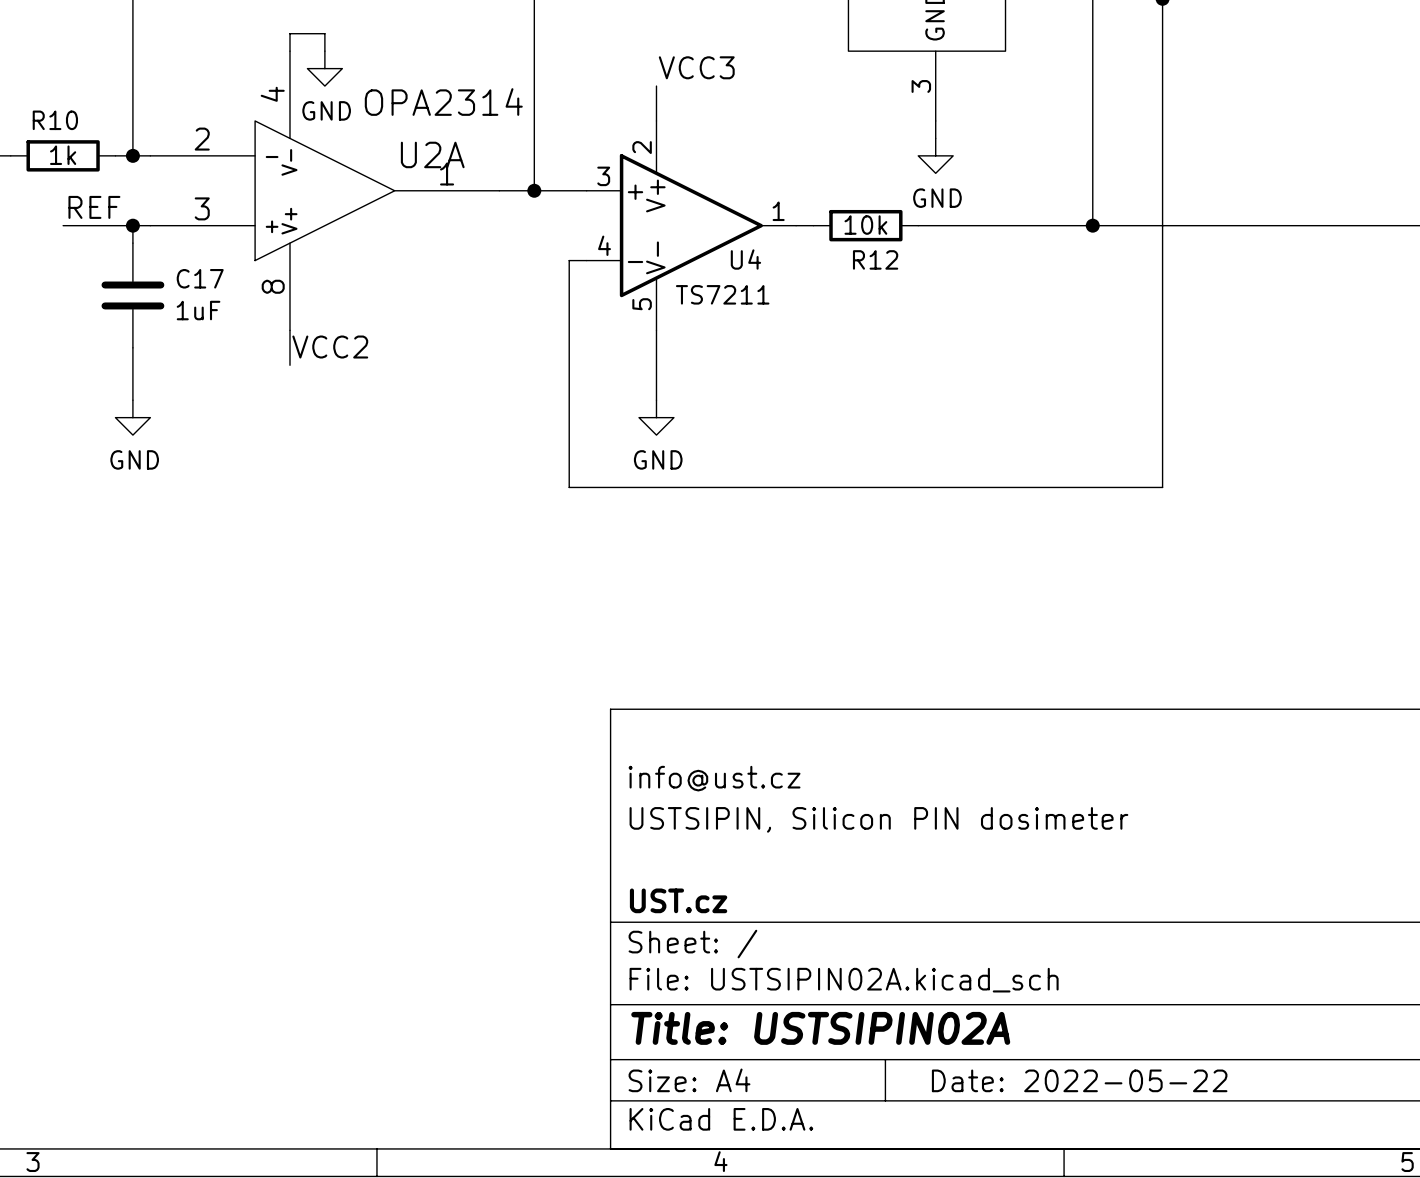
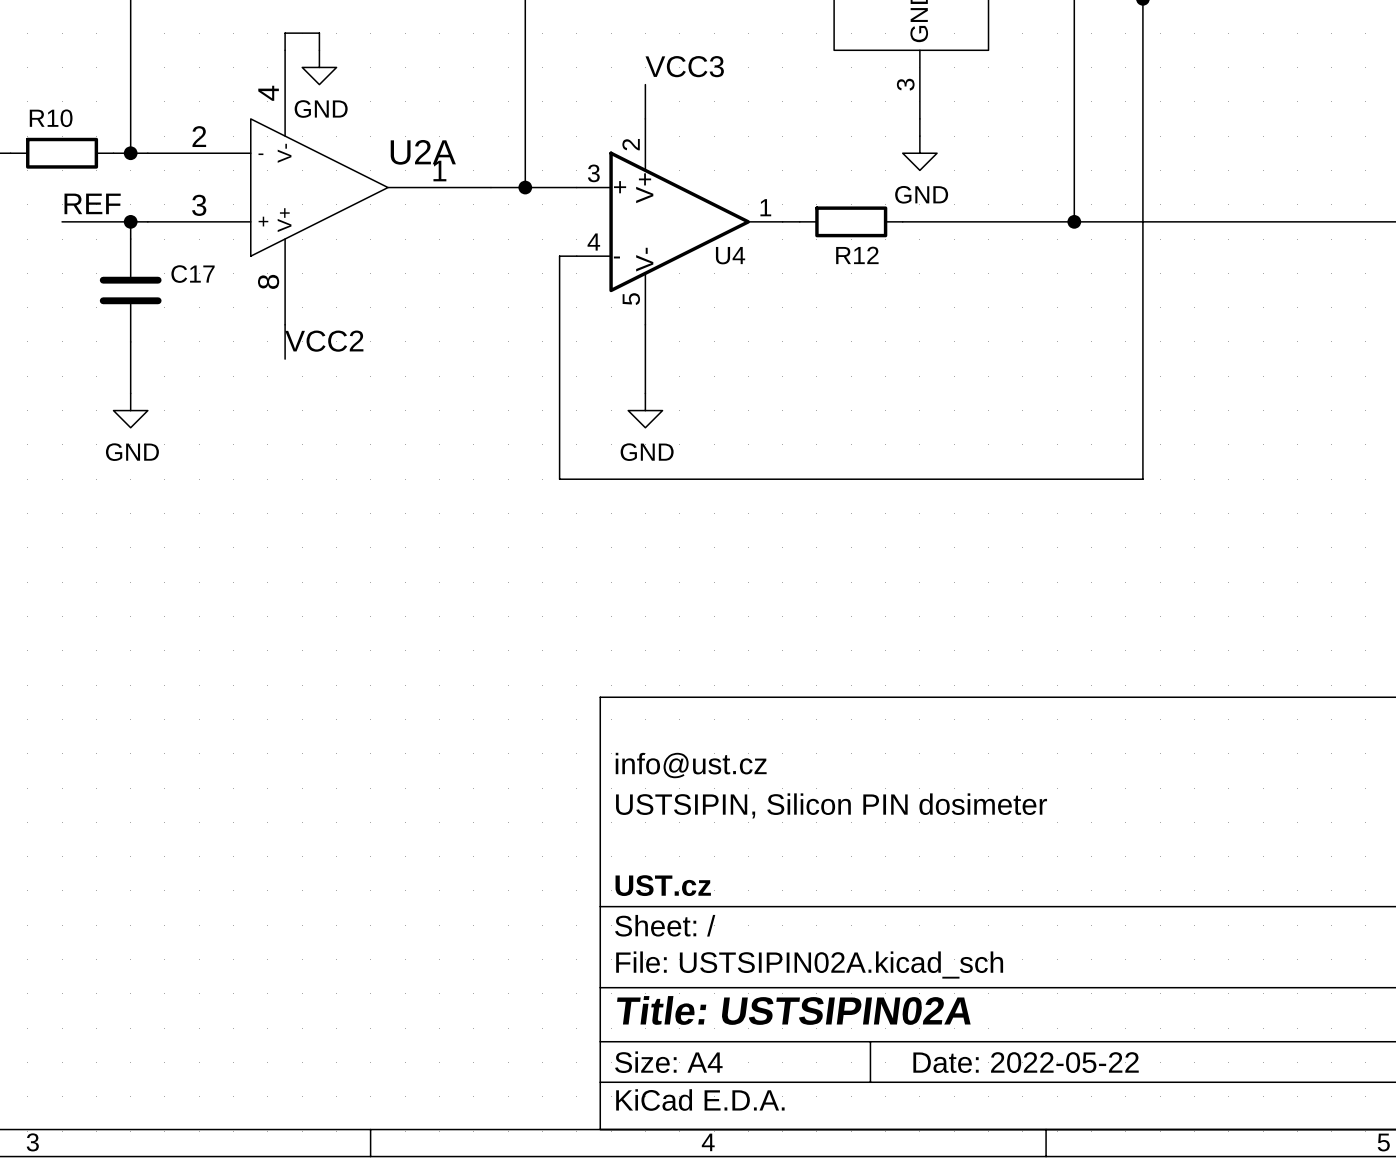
U2A value: OPA2314 (443, 102) -> none
R10 value: 1k (63, 155) -> none
R12 value: 10k (865, 225) -> none
U4 value: TS7211 (722, 294) -> none
C17 value: 1uF (198, 310) -> none

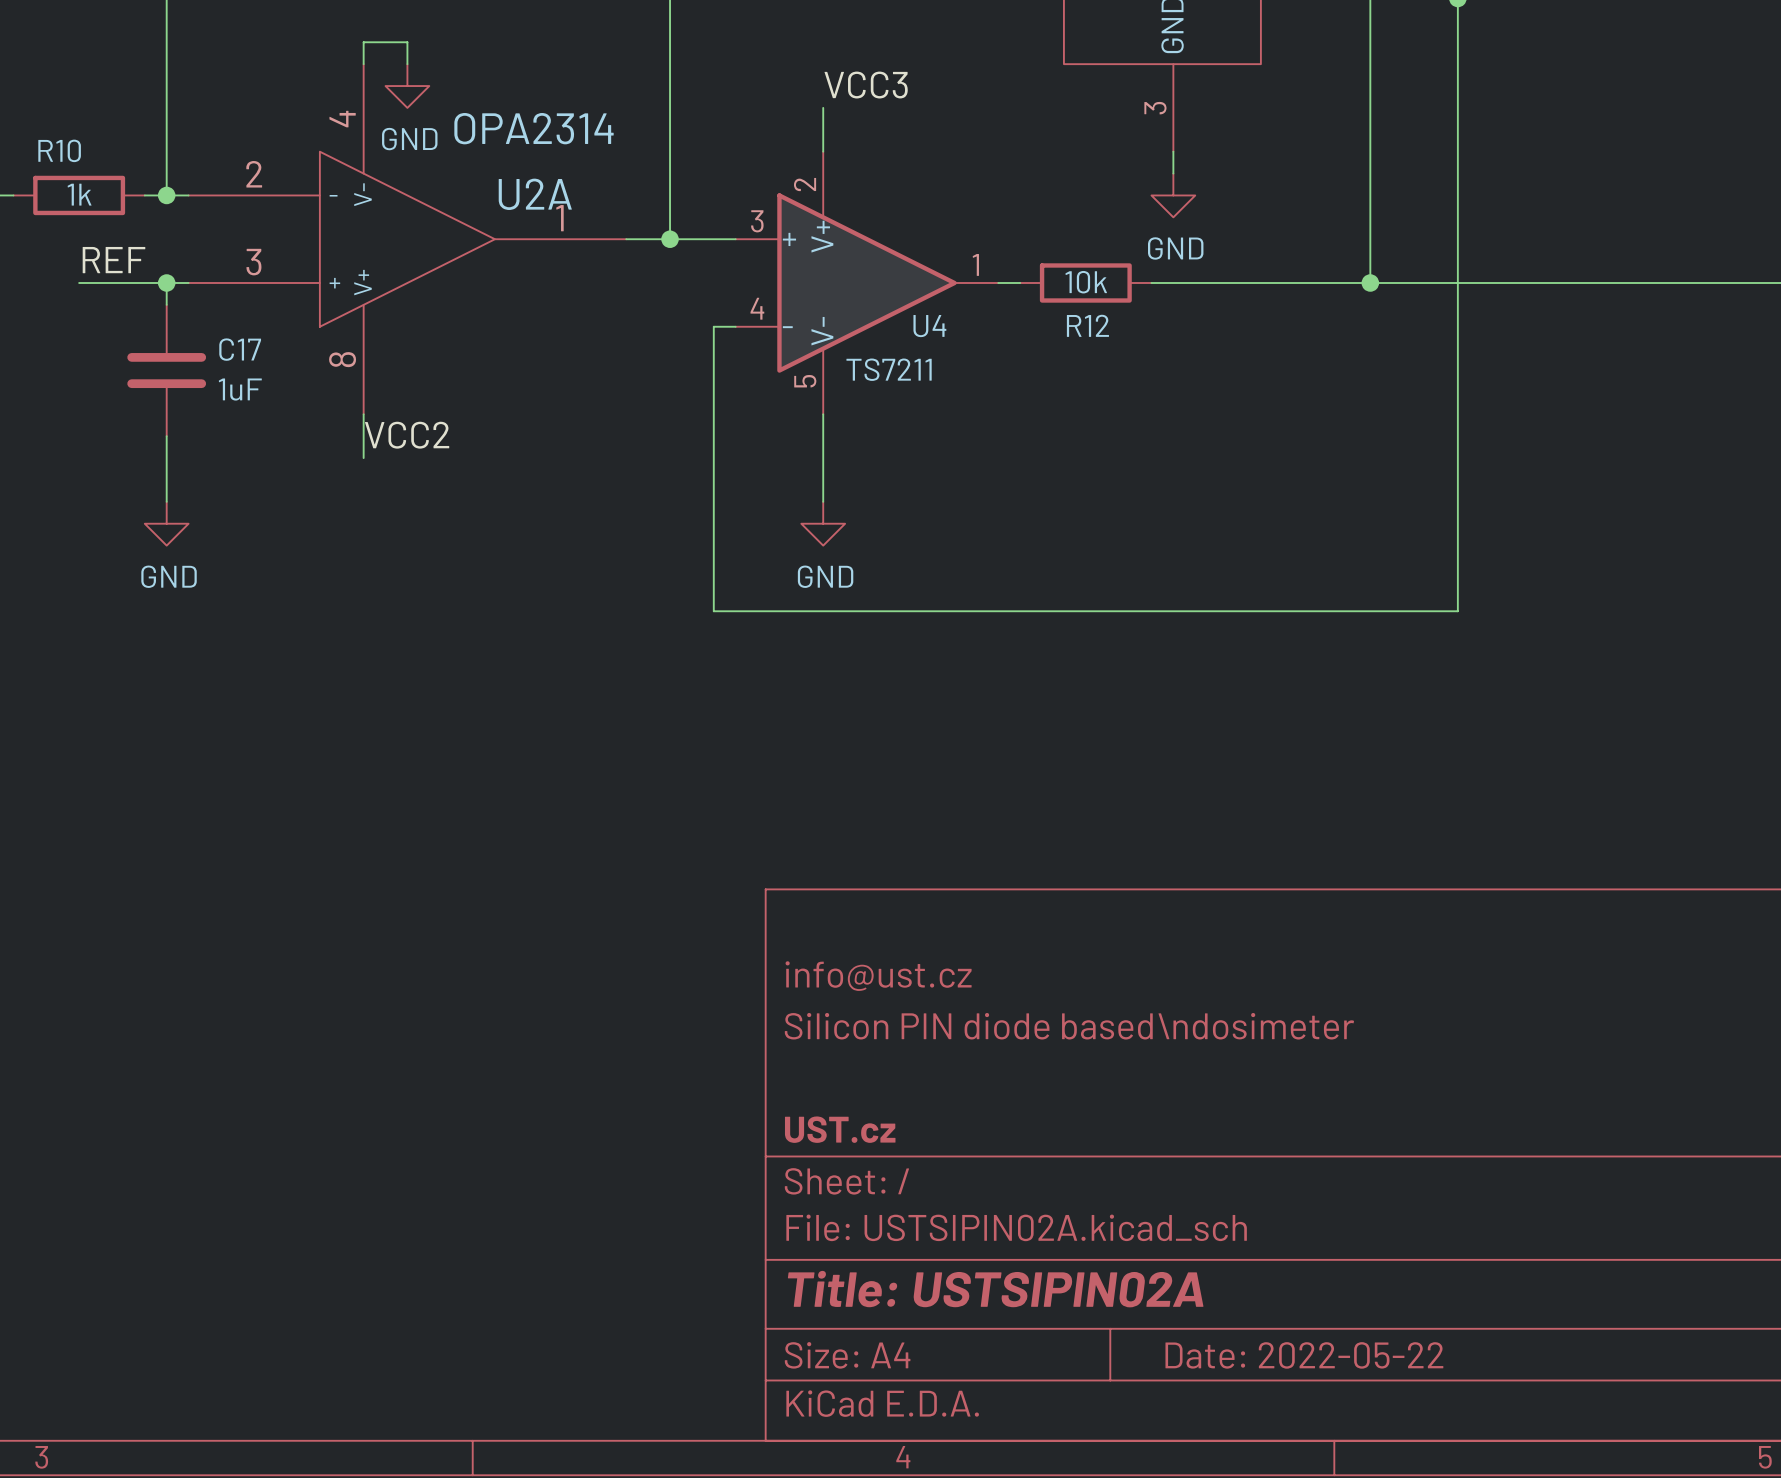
U2A value: none -> OPA2314 (534, 128)
R10 value: none -> 1k (79, 194)
R12 value: none -> 10k (1086, 282)
U4 value: none -> TS7211 (889, 369)
C17 value: none -> 1uF (240, 389)
title block: USTSIPIN, Silicon PIN dosimeter (831, 805) -> Silicon PIN diode based\ndosimeter (1069, 1026)

